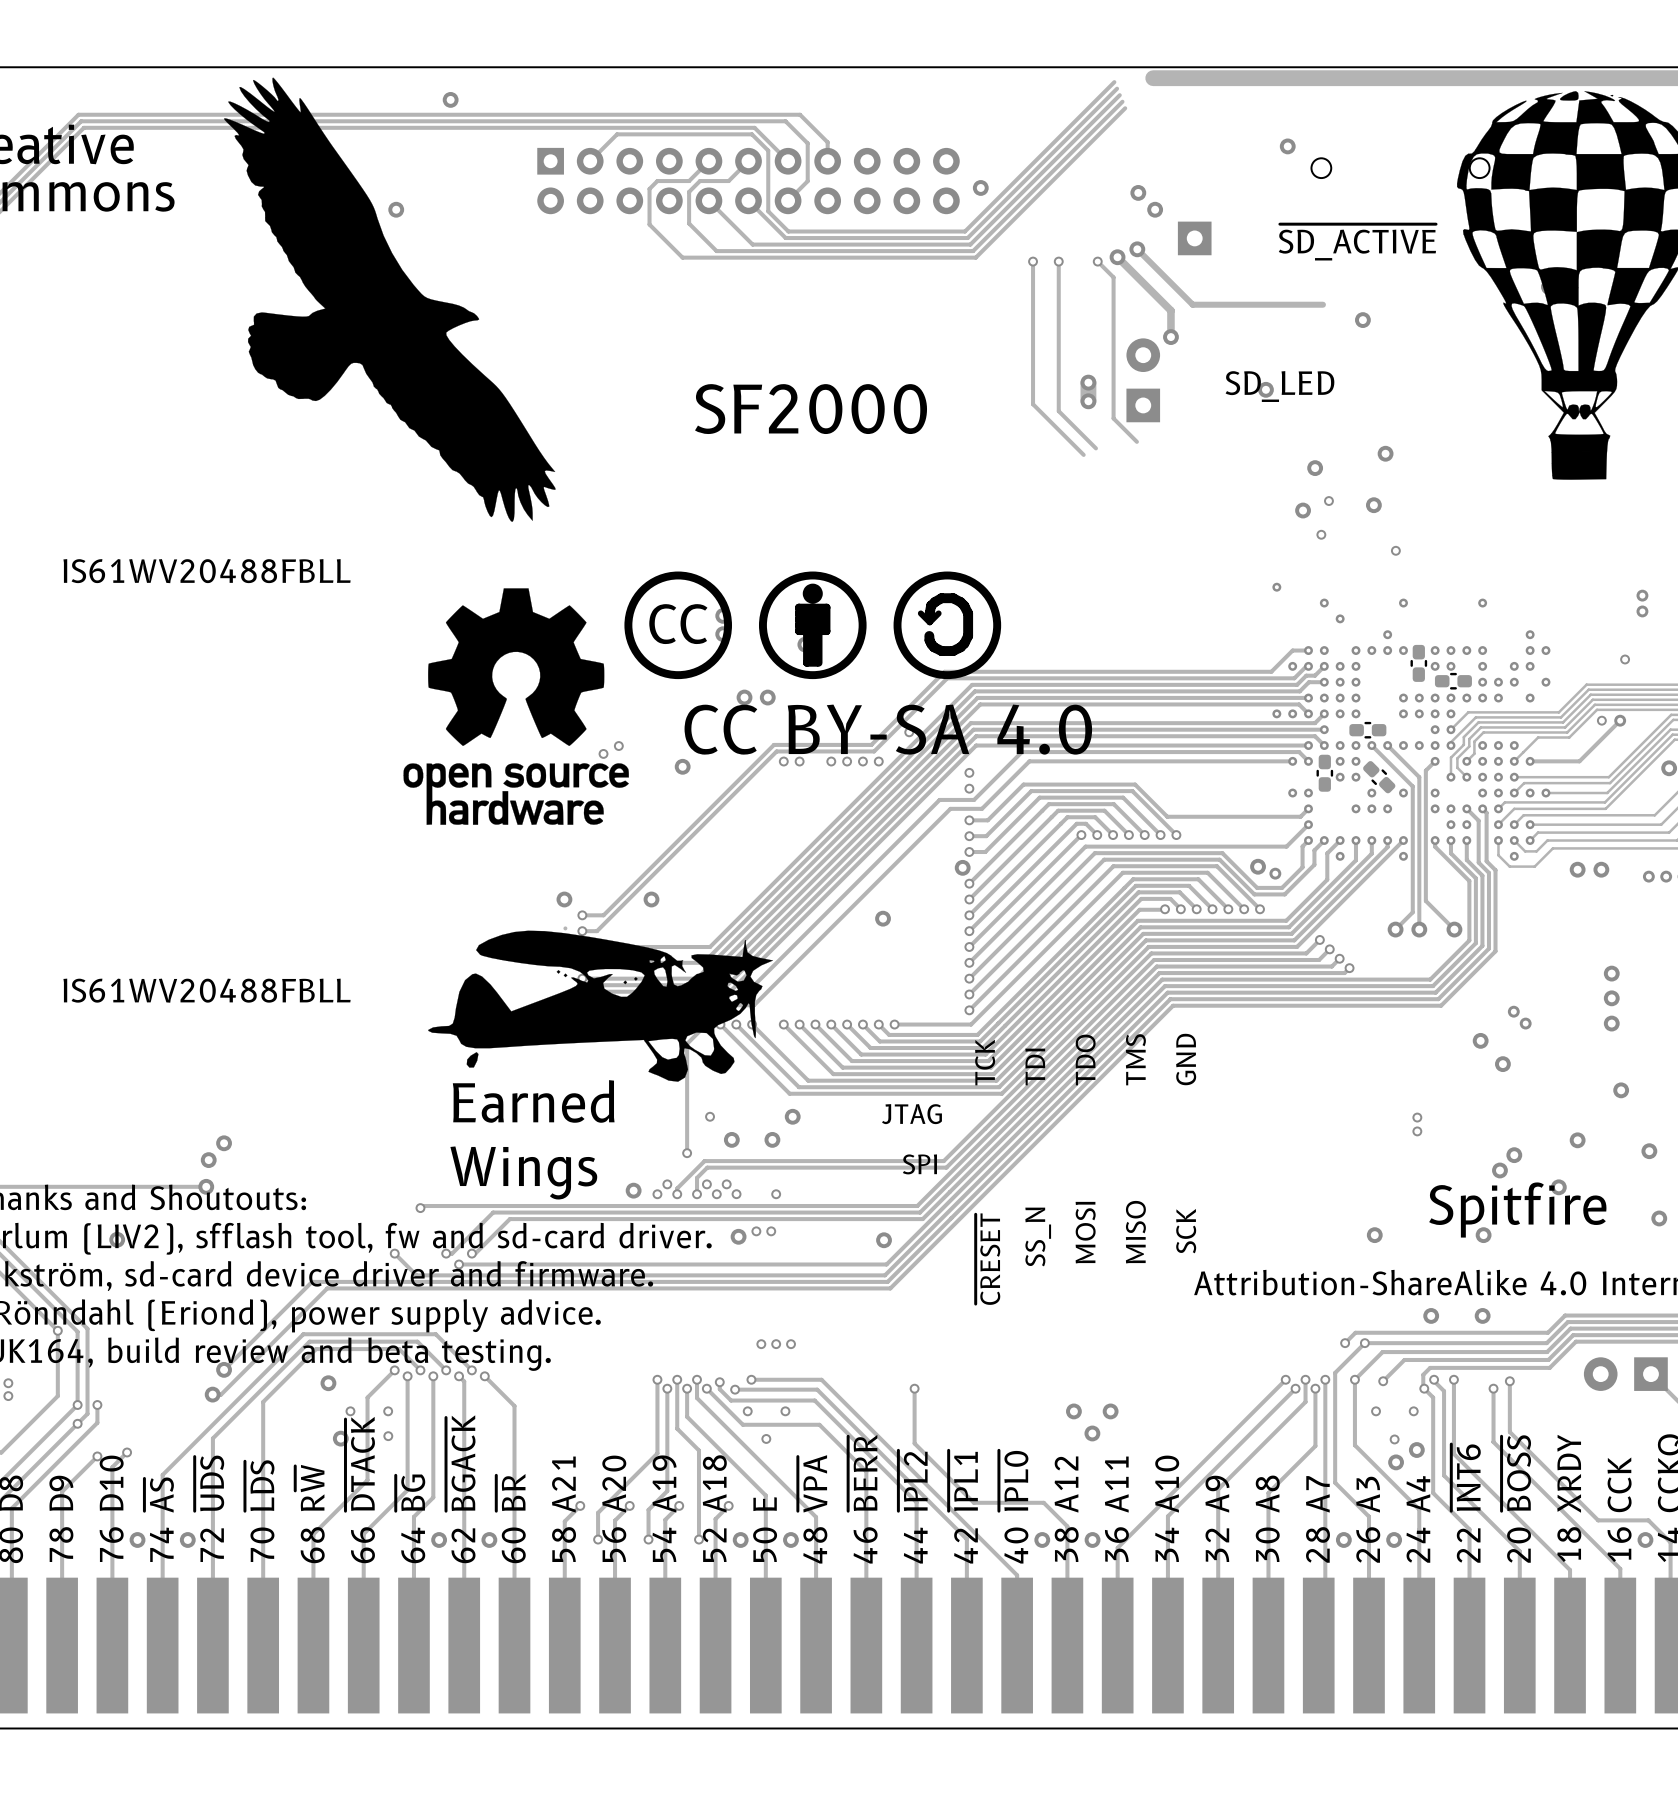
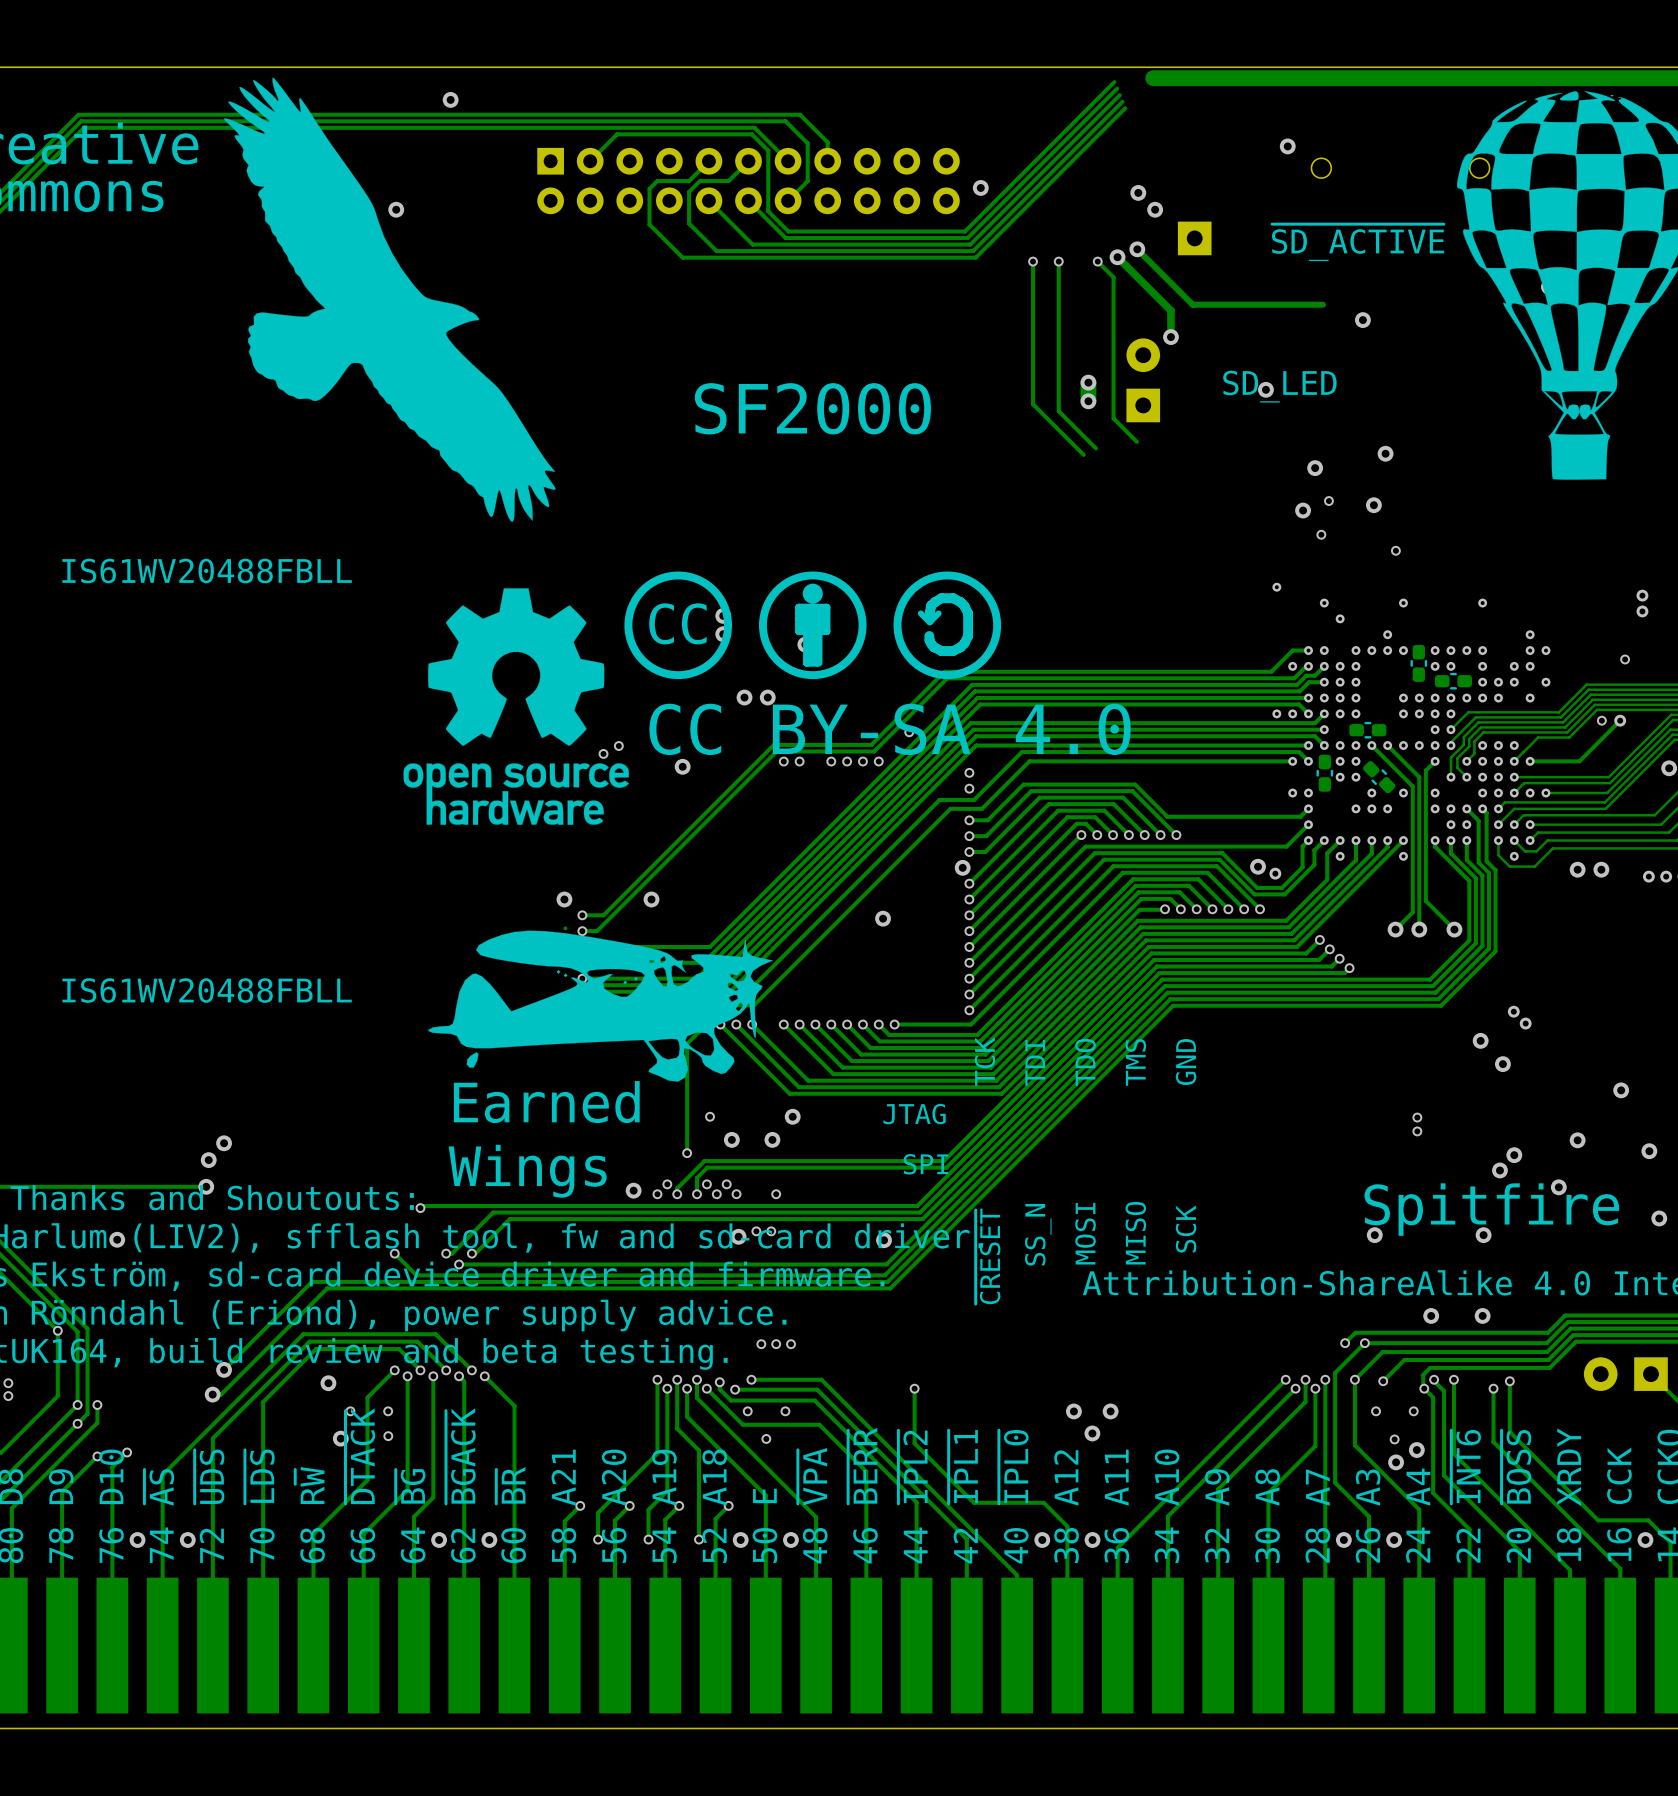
via: (1611, 973) -> none
via: (1611, 998) -> none
via: (1611, 1023) -> none

